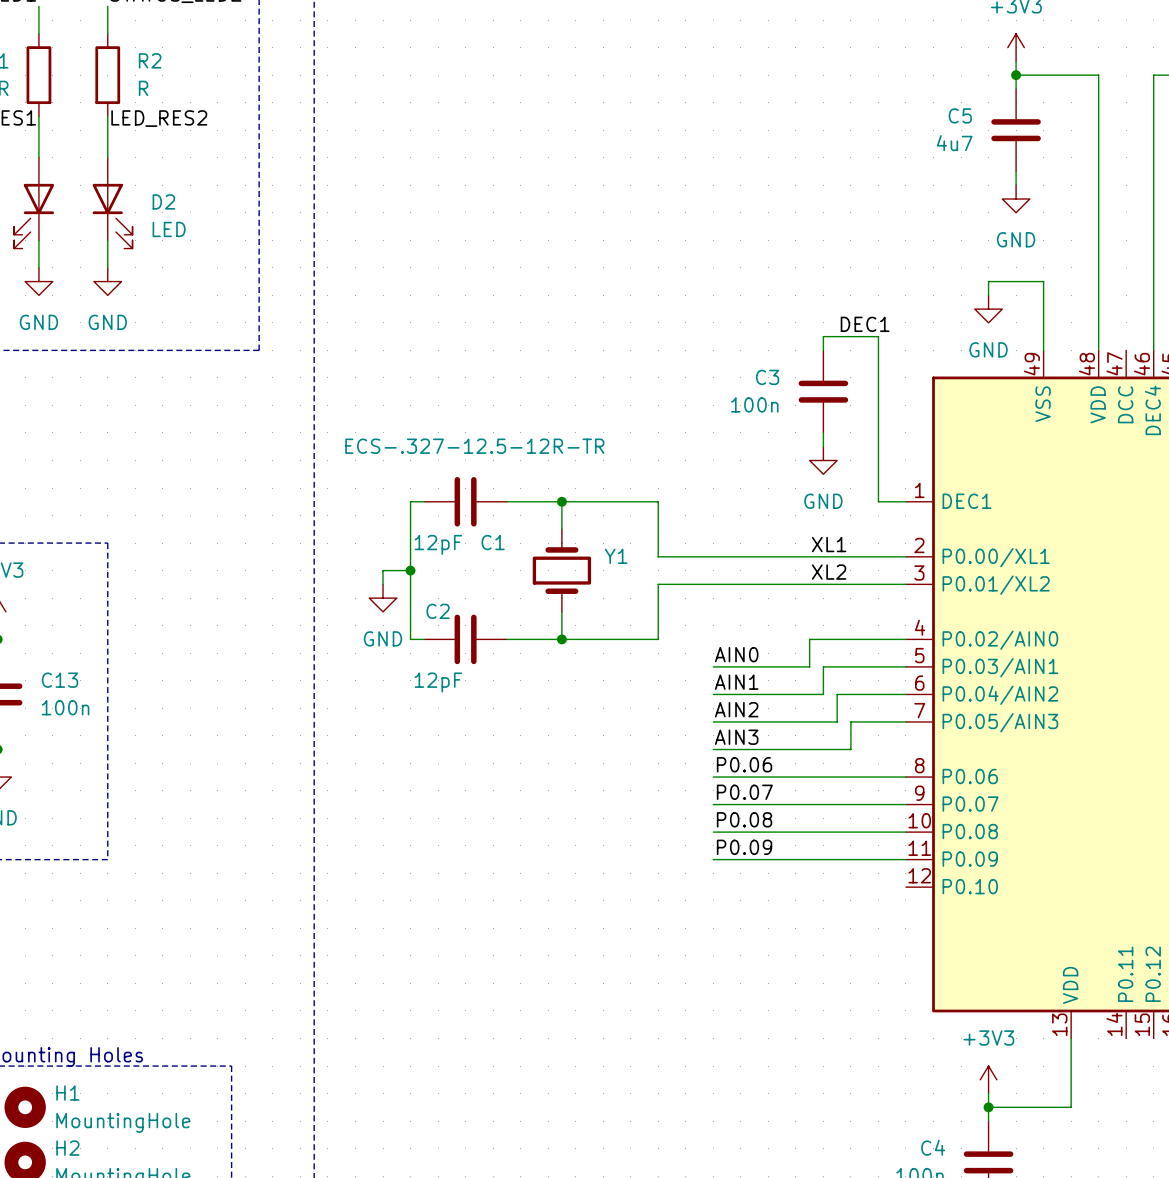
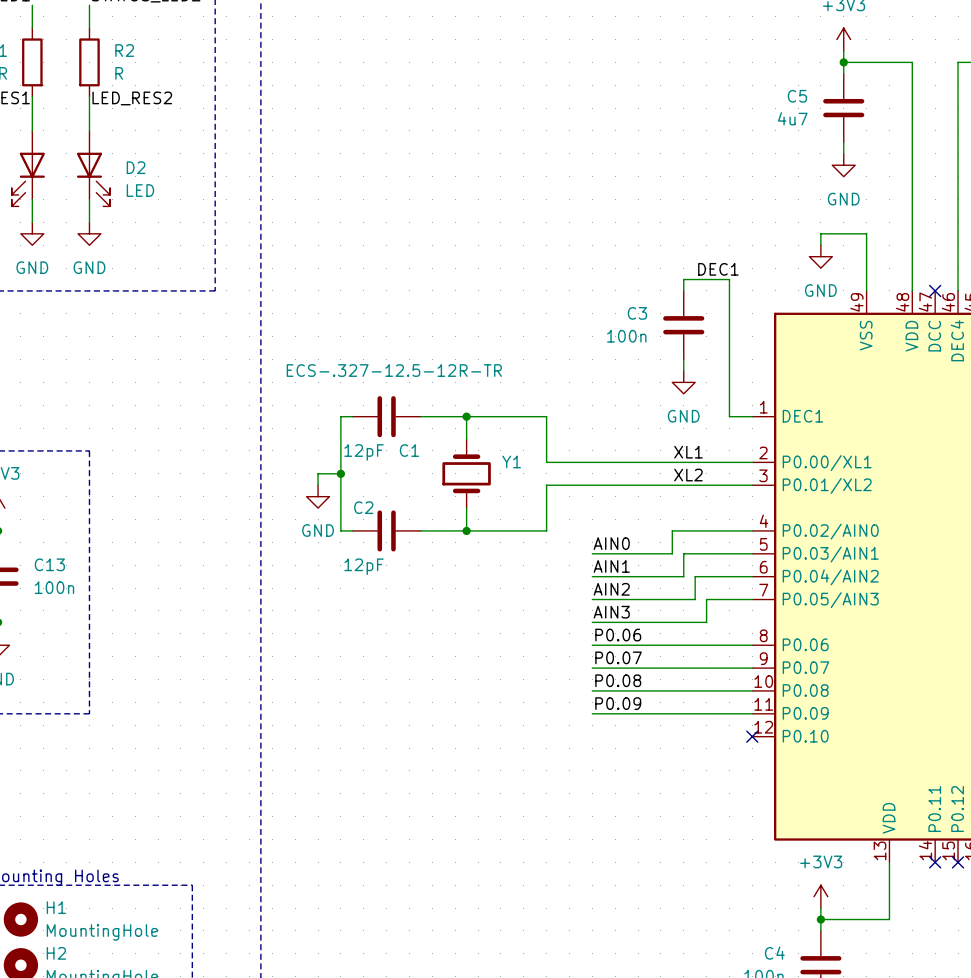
no-connect mark: none -> (935, 290)
no-connect mark: none -> (752, 736)
no-connect mark: none -> (935, 862)
no-connect mark: none -> (958, 862)

